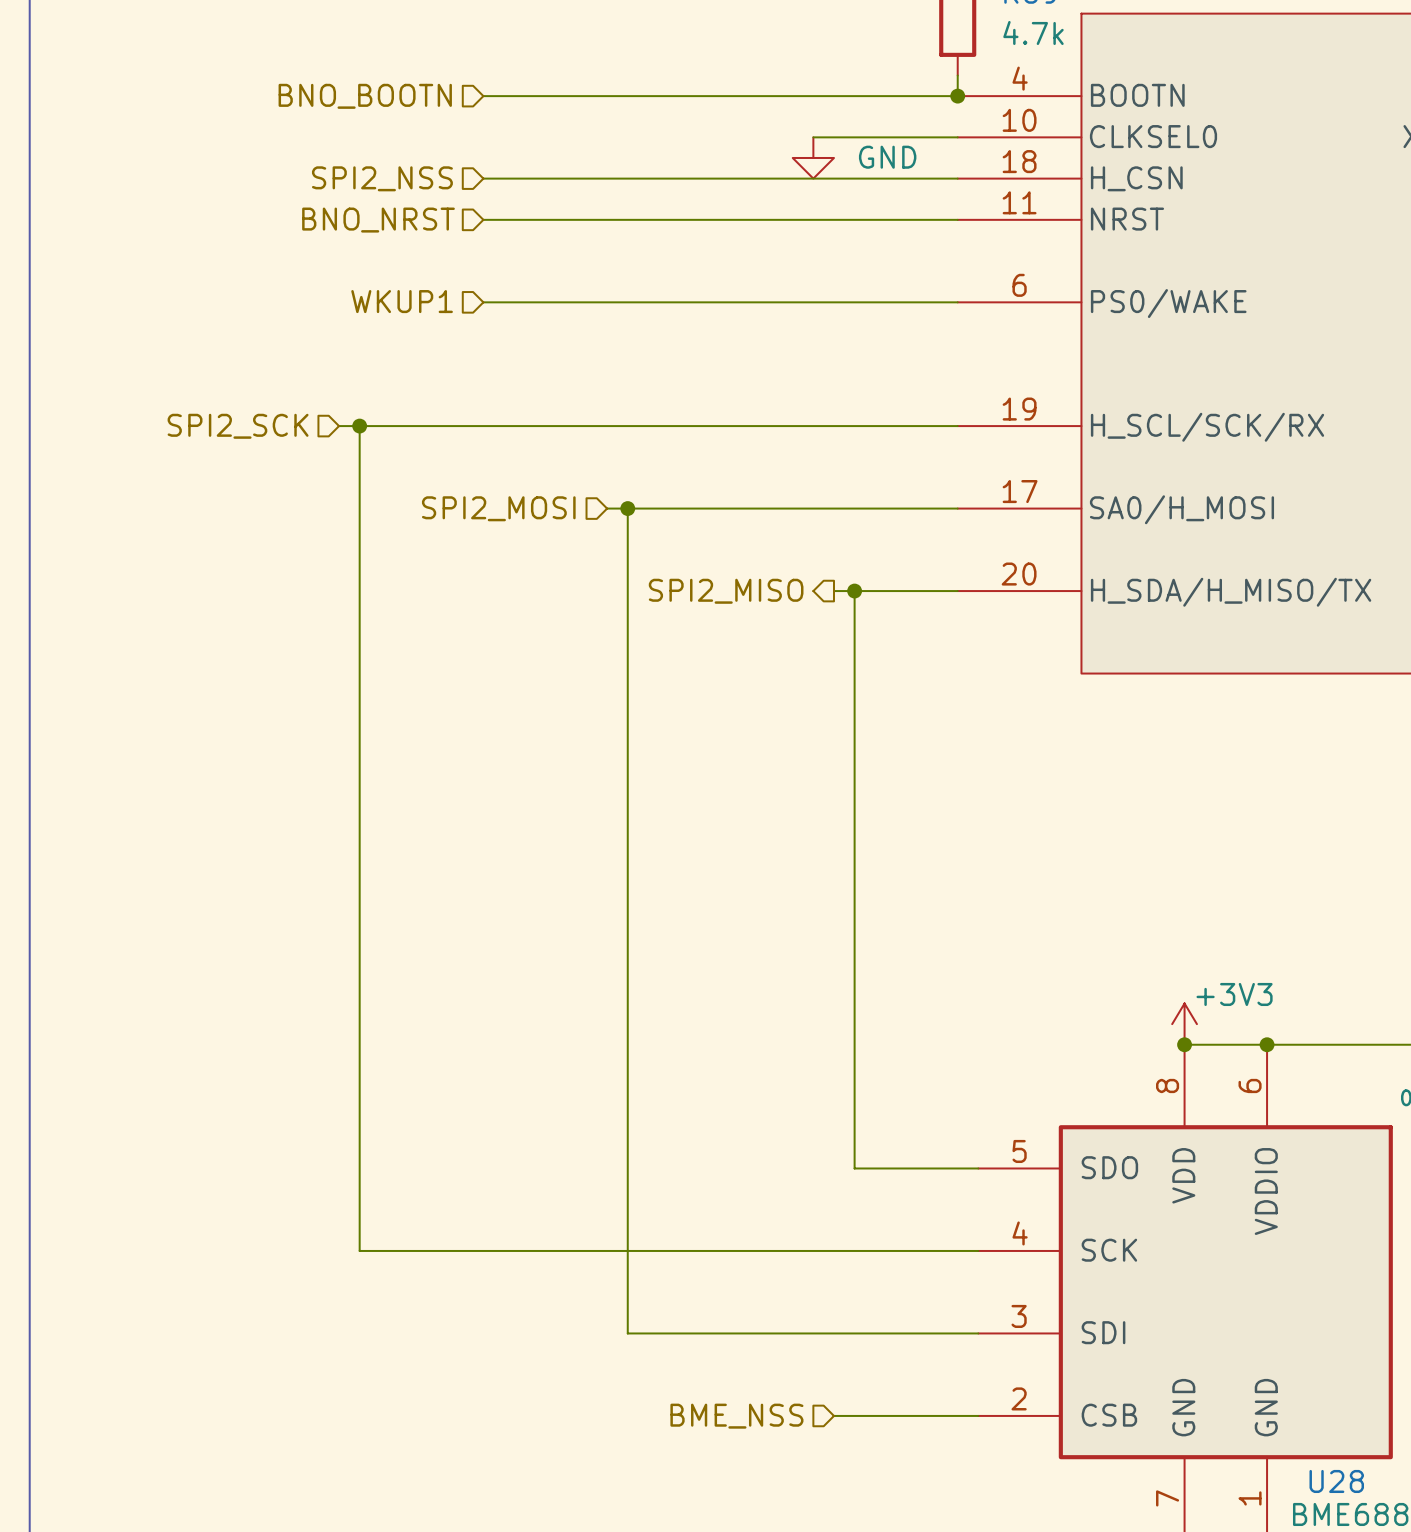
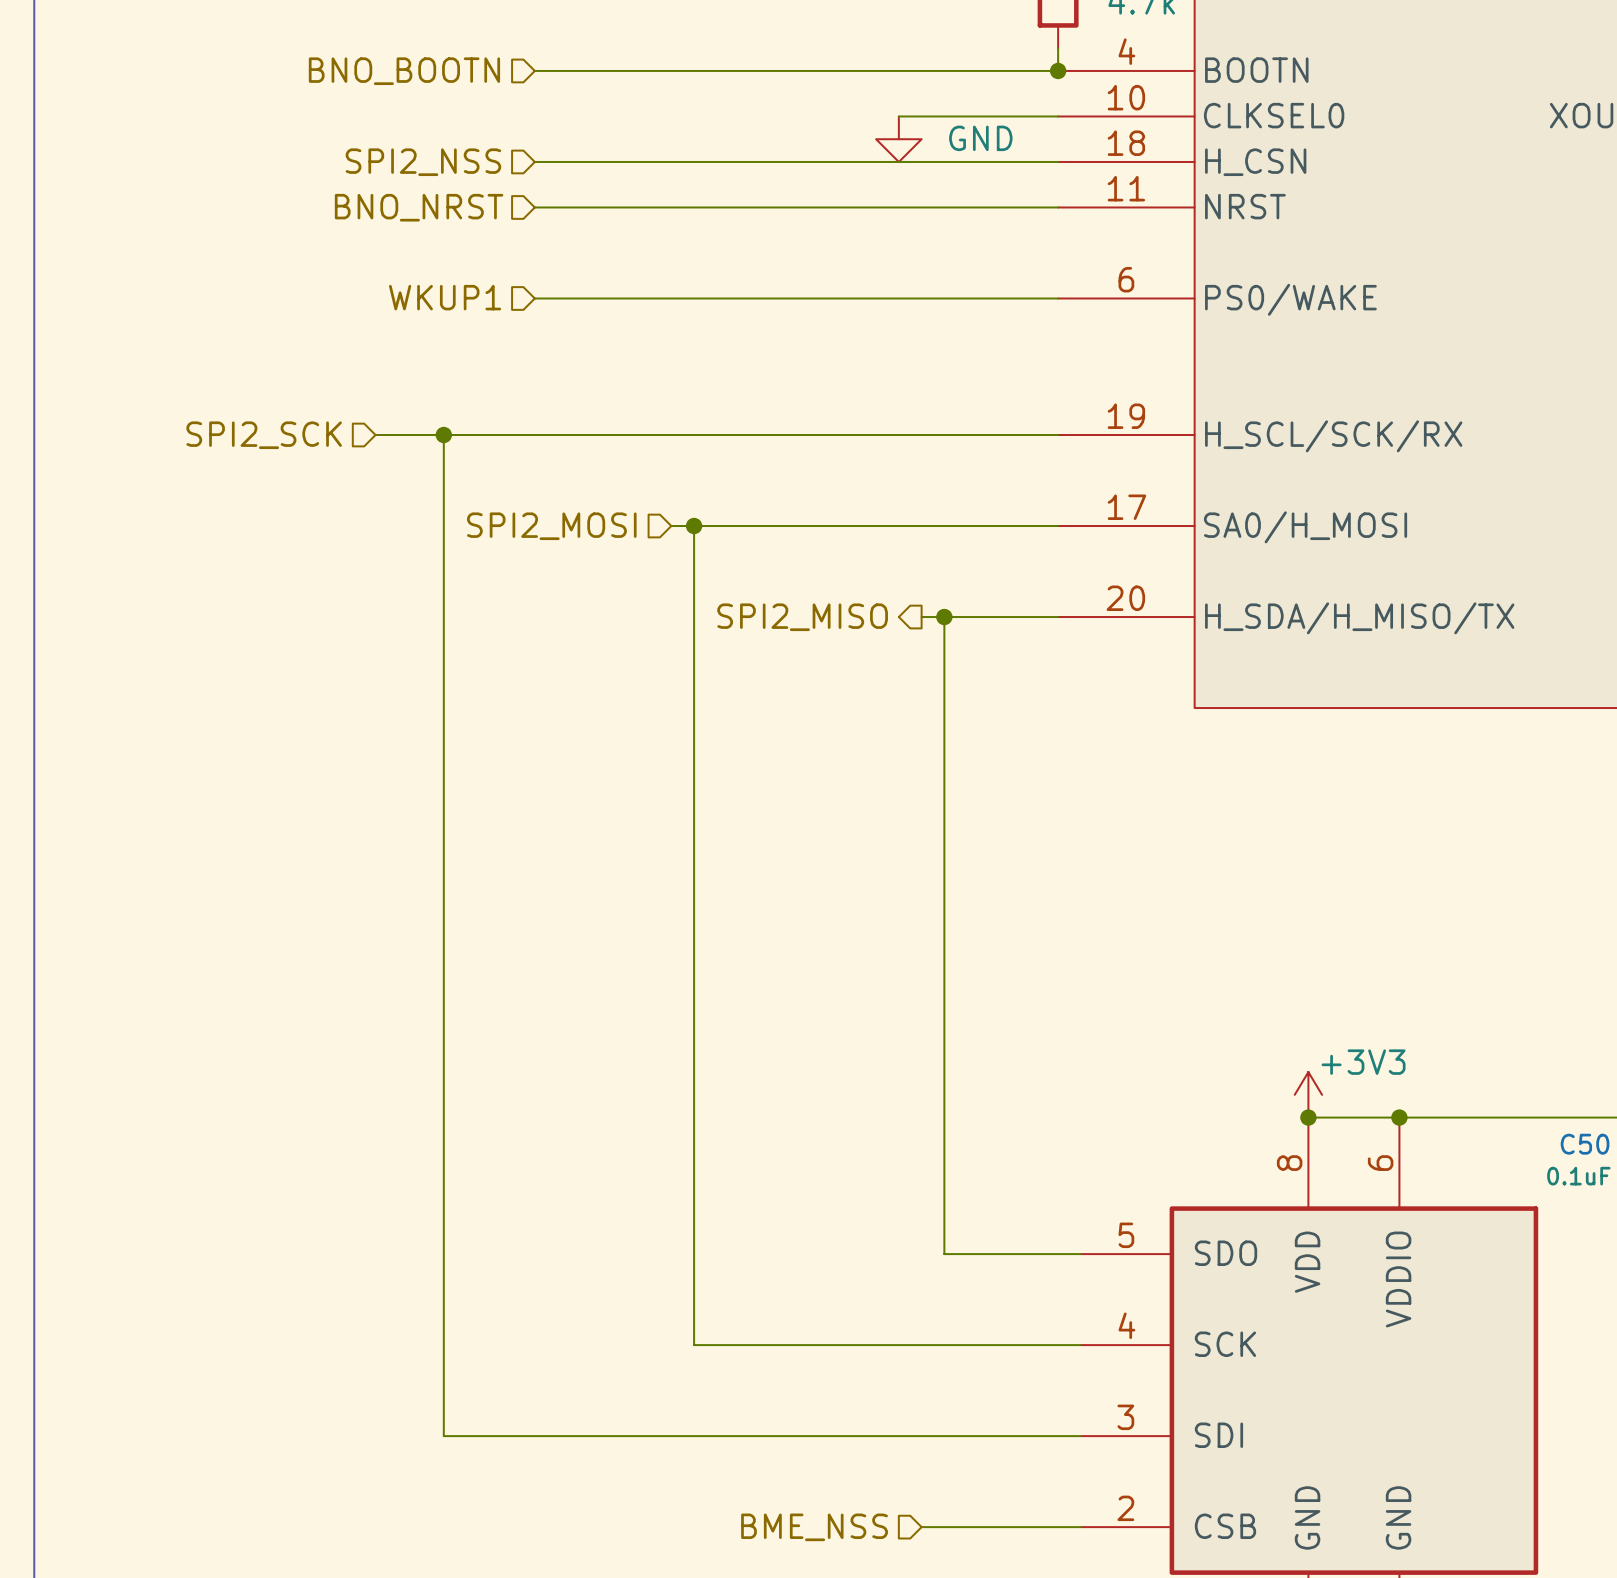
wire: (359, 426) (359, 1250) (627, 1250) (627, 1333) -> (443, 435) (443, 1436) (694, 1436)
junction position: (359, 426) -> (443, 435)

